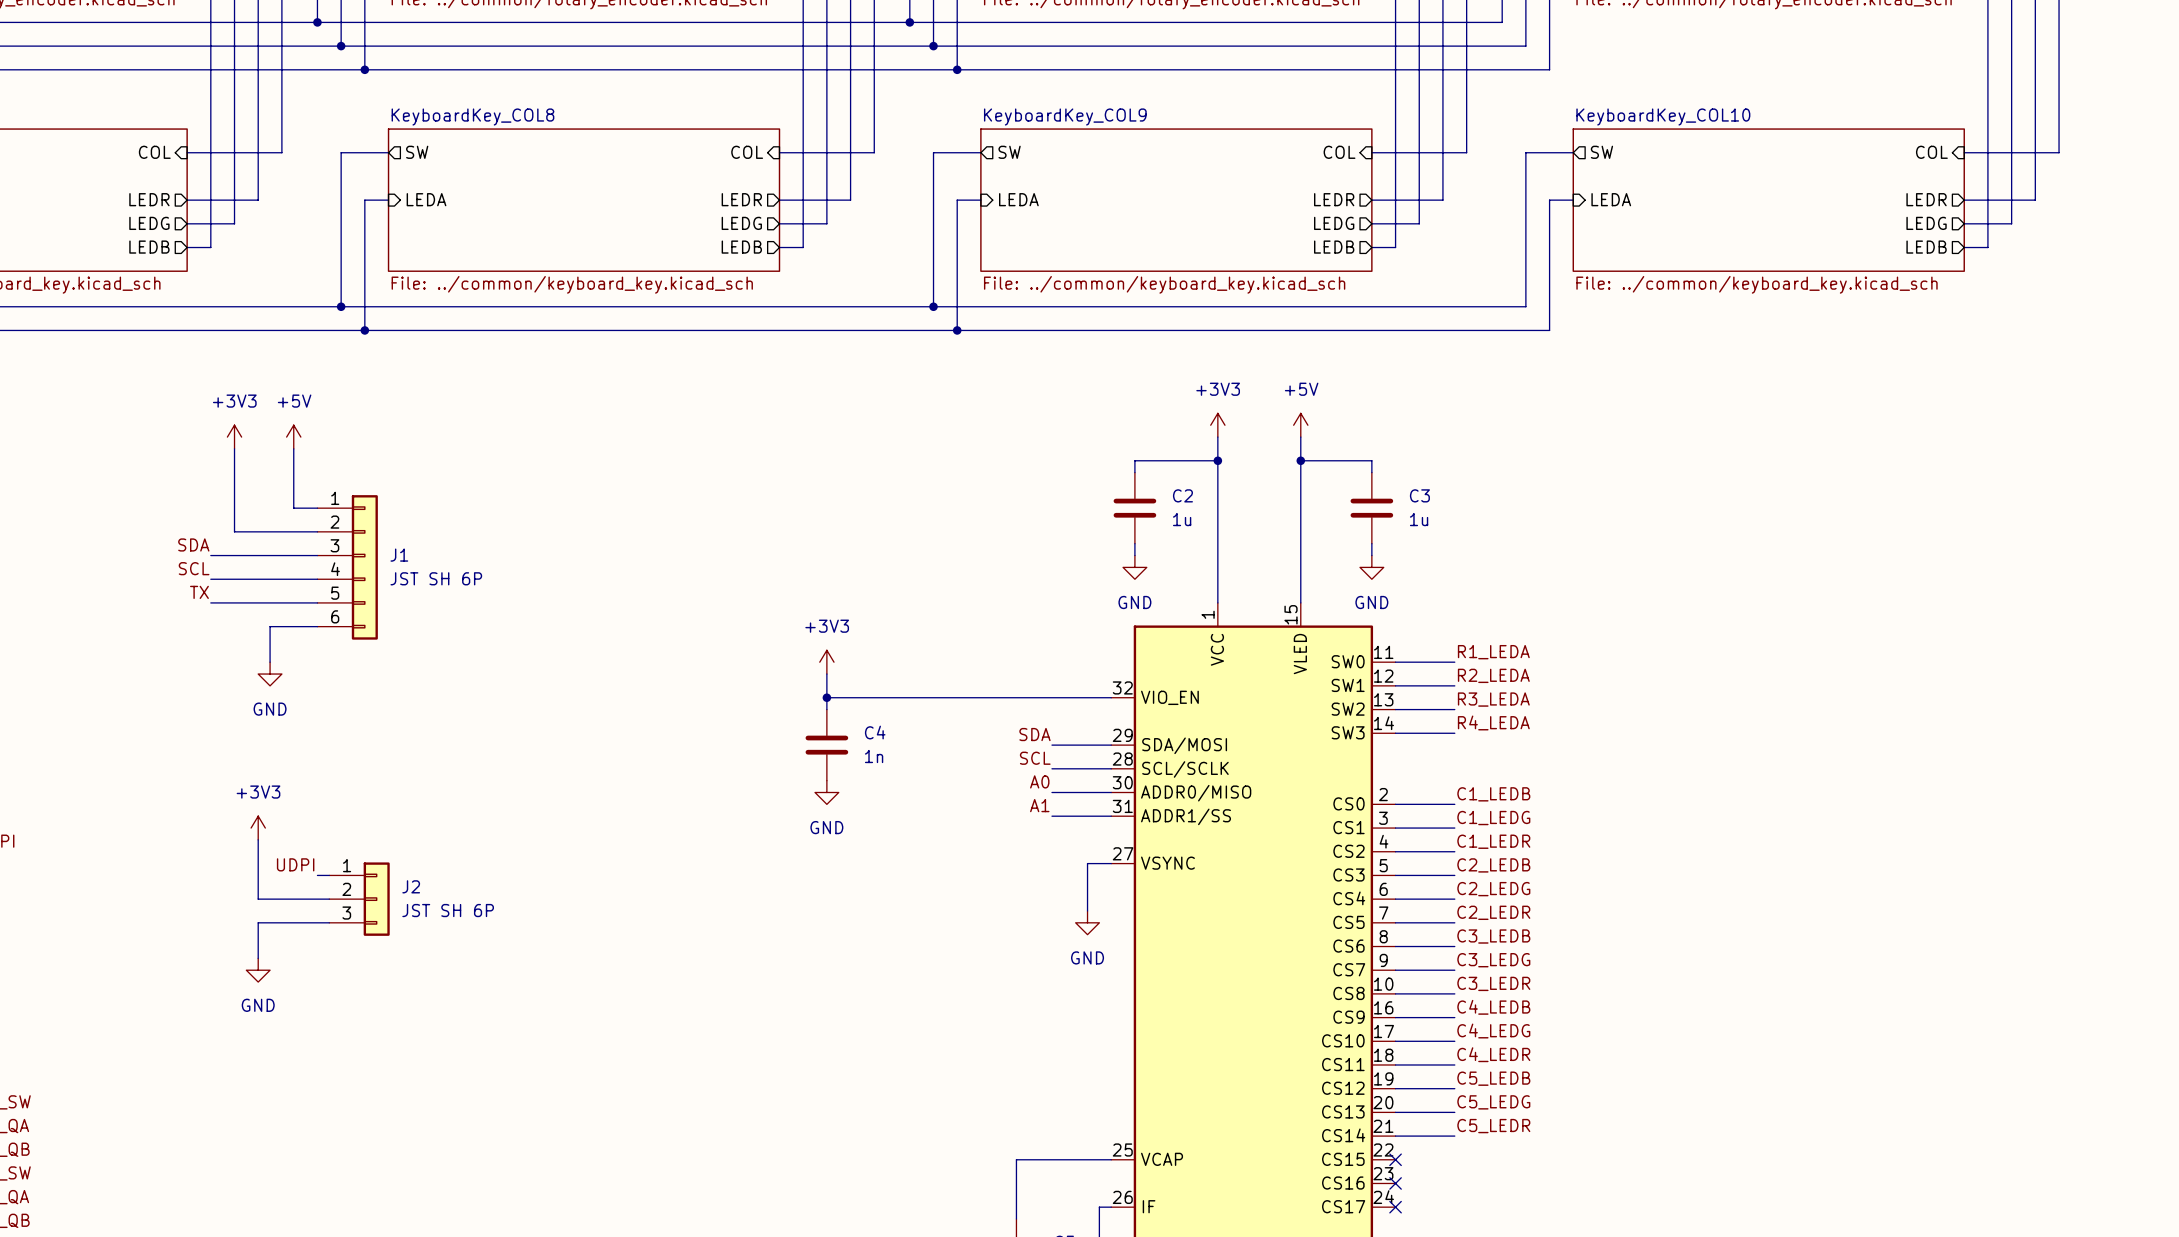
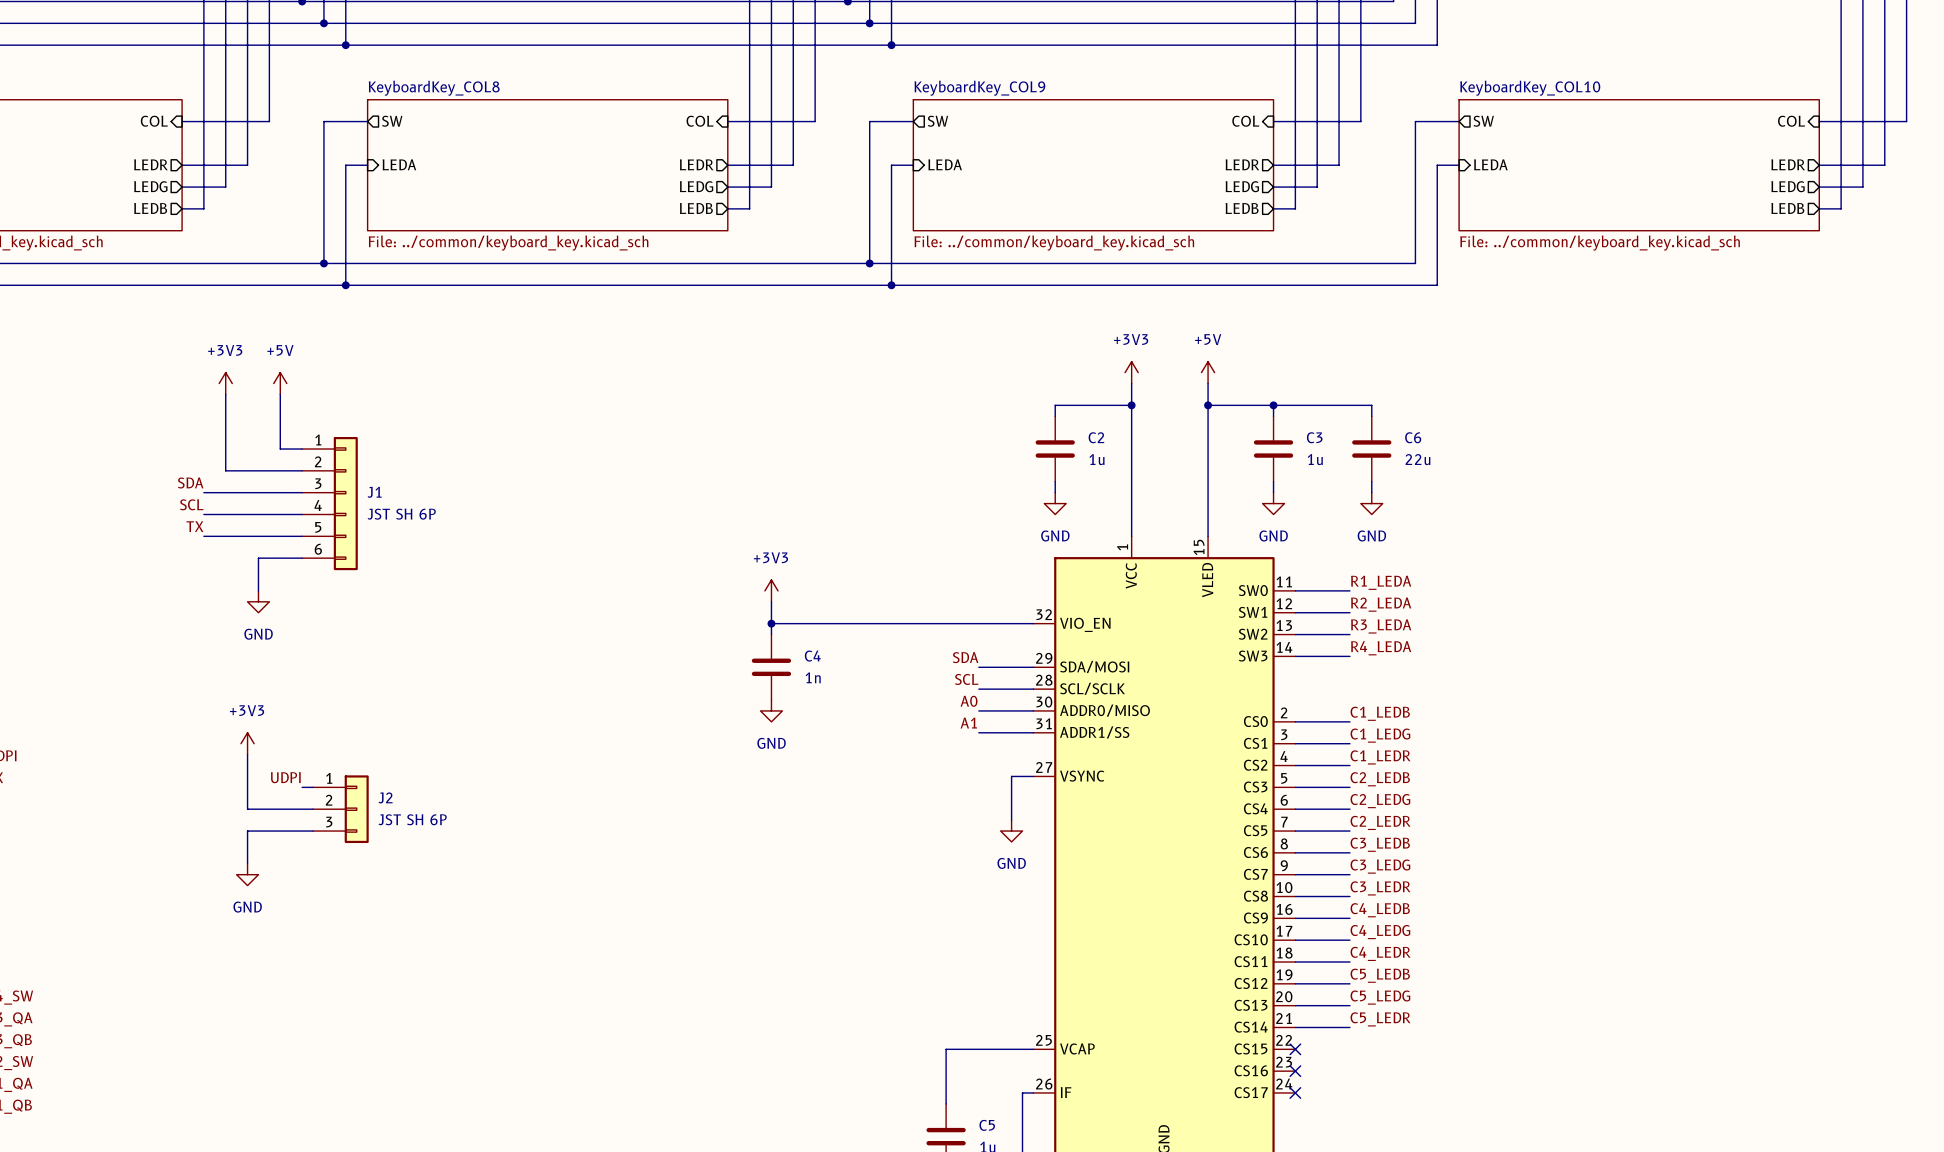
wire: none -> (1273, 405) (1371, 405) (1371, 416)
junction: none -> (1273, 405)
C6: none -> 22u (1371, 449)
wire: none -> (1371, 481) (1371, 492)
power symbol: none -> GND (1371, 503)

